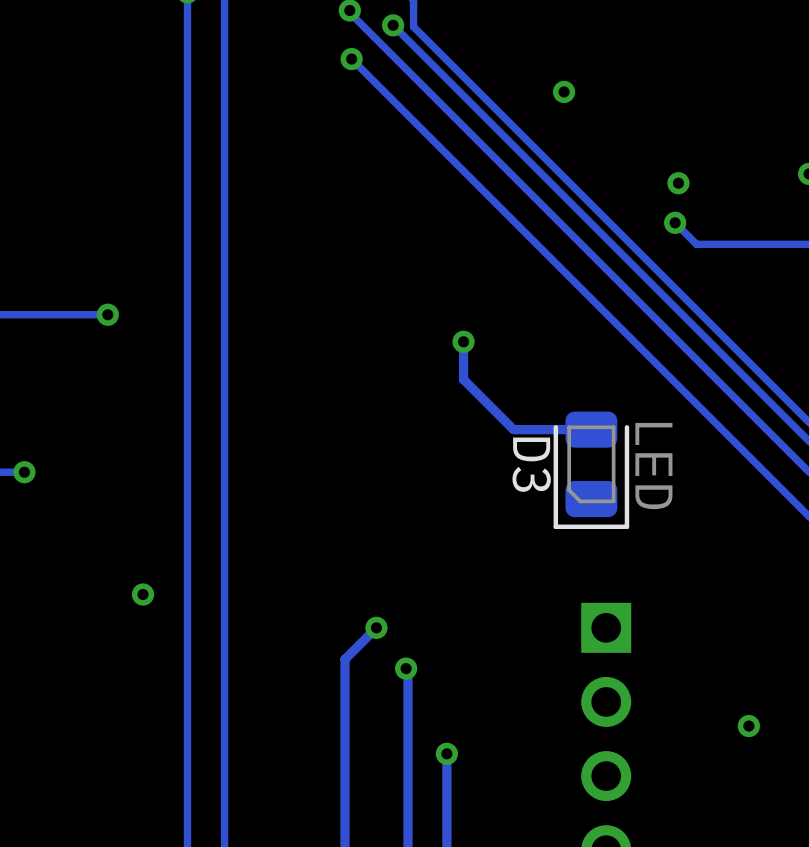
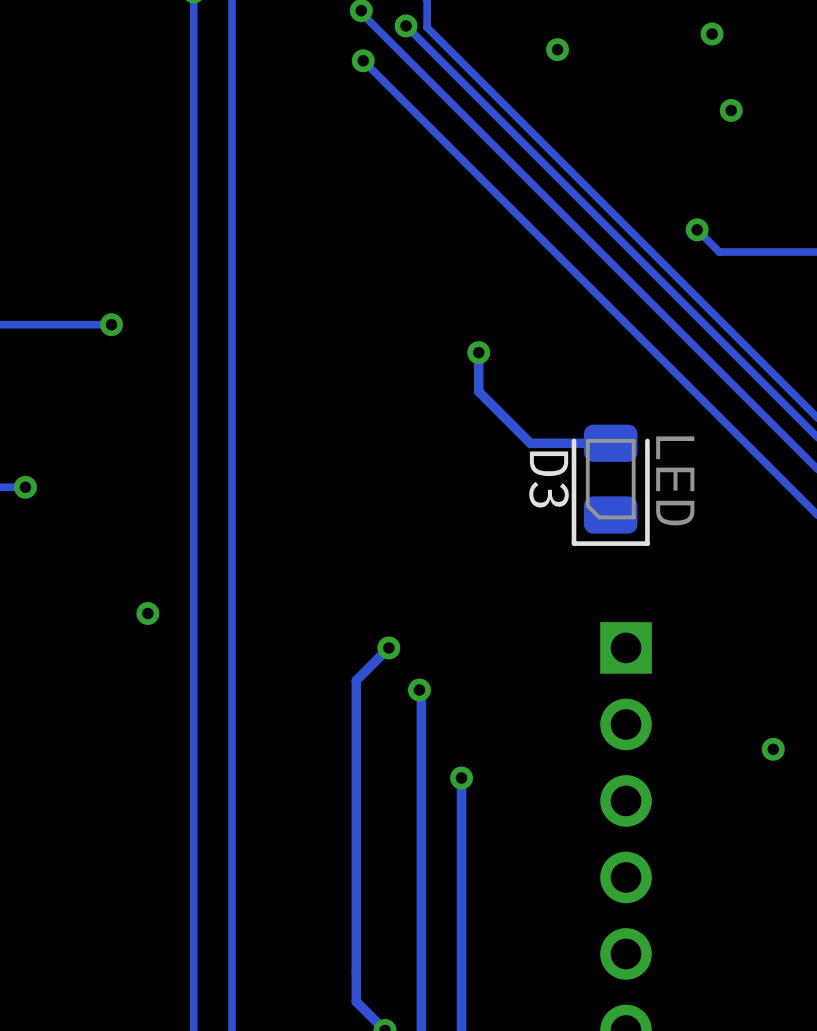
via: none -> (712, 33)
via position: (564, 91) -> (557, 49)
via: none -> (731, 110)
via: (678, 183) -> none

